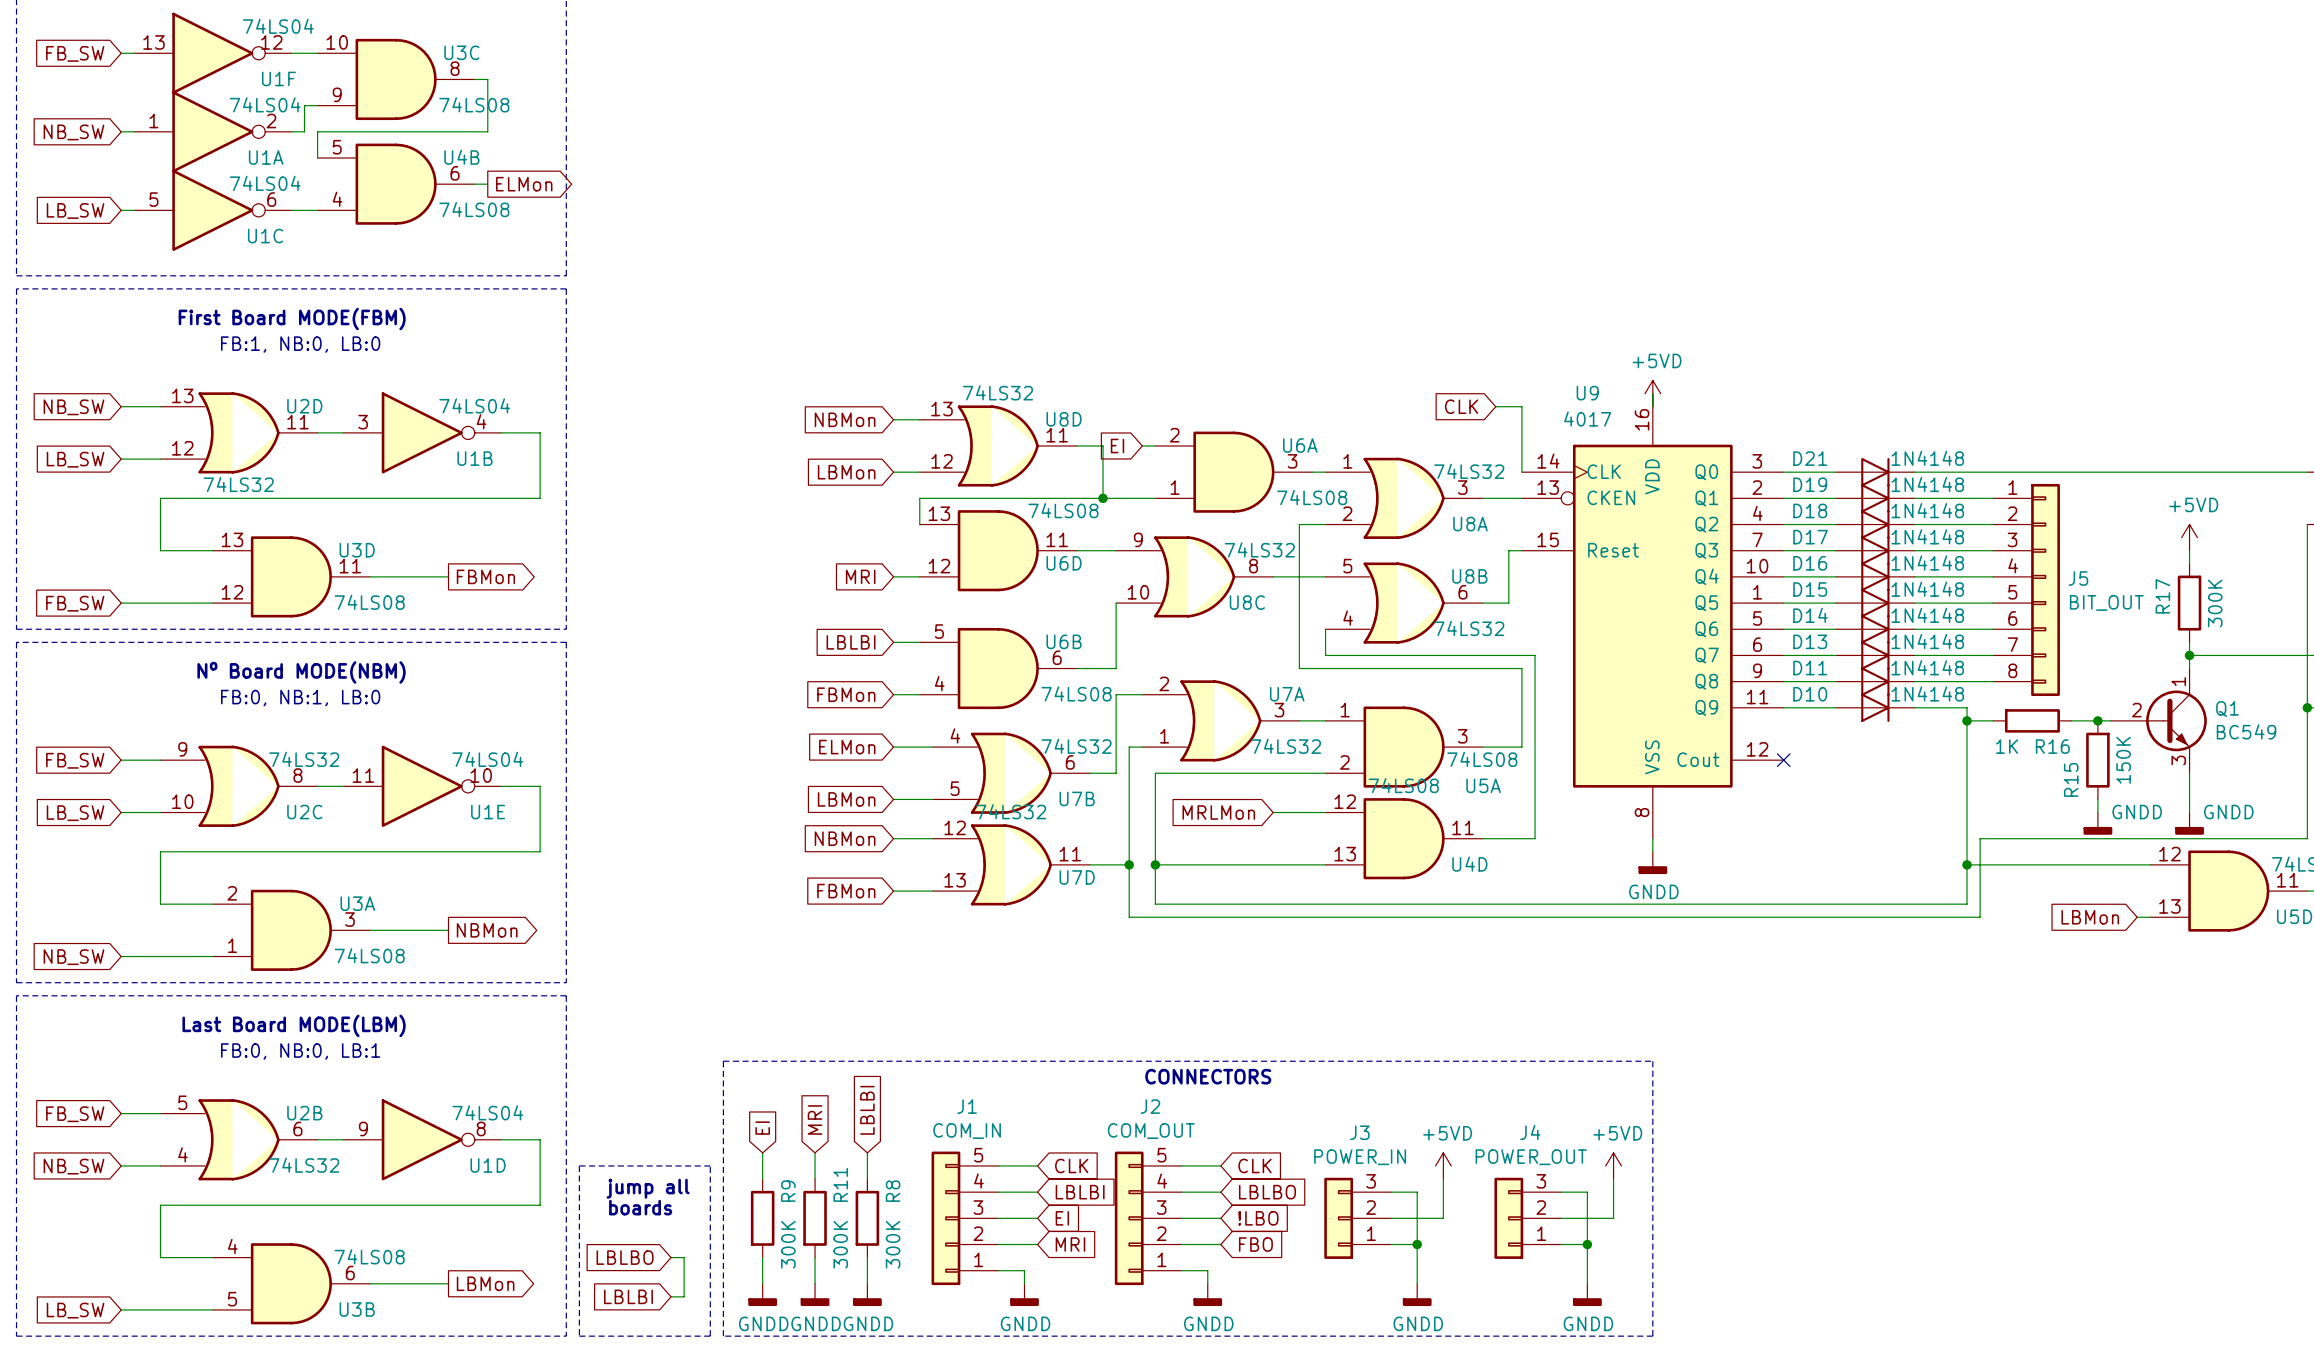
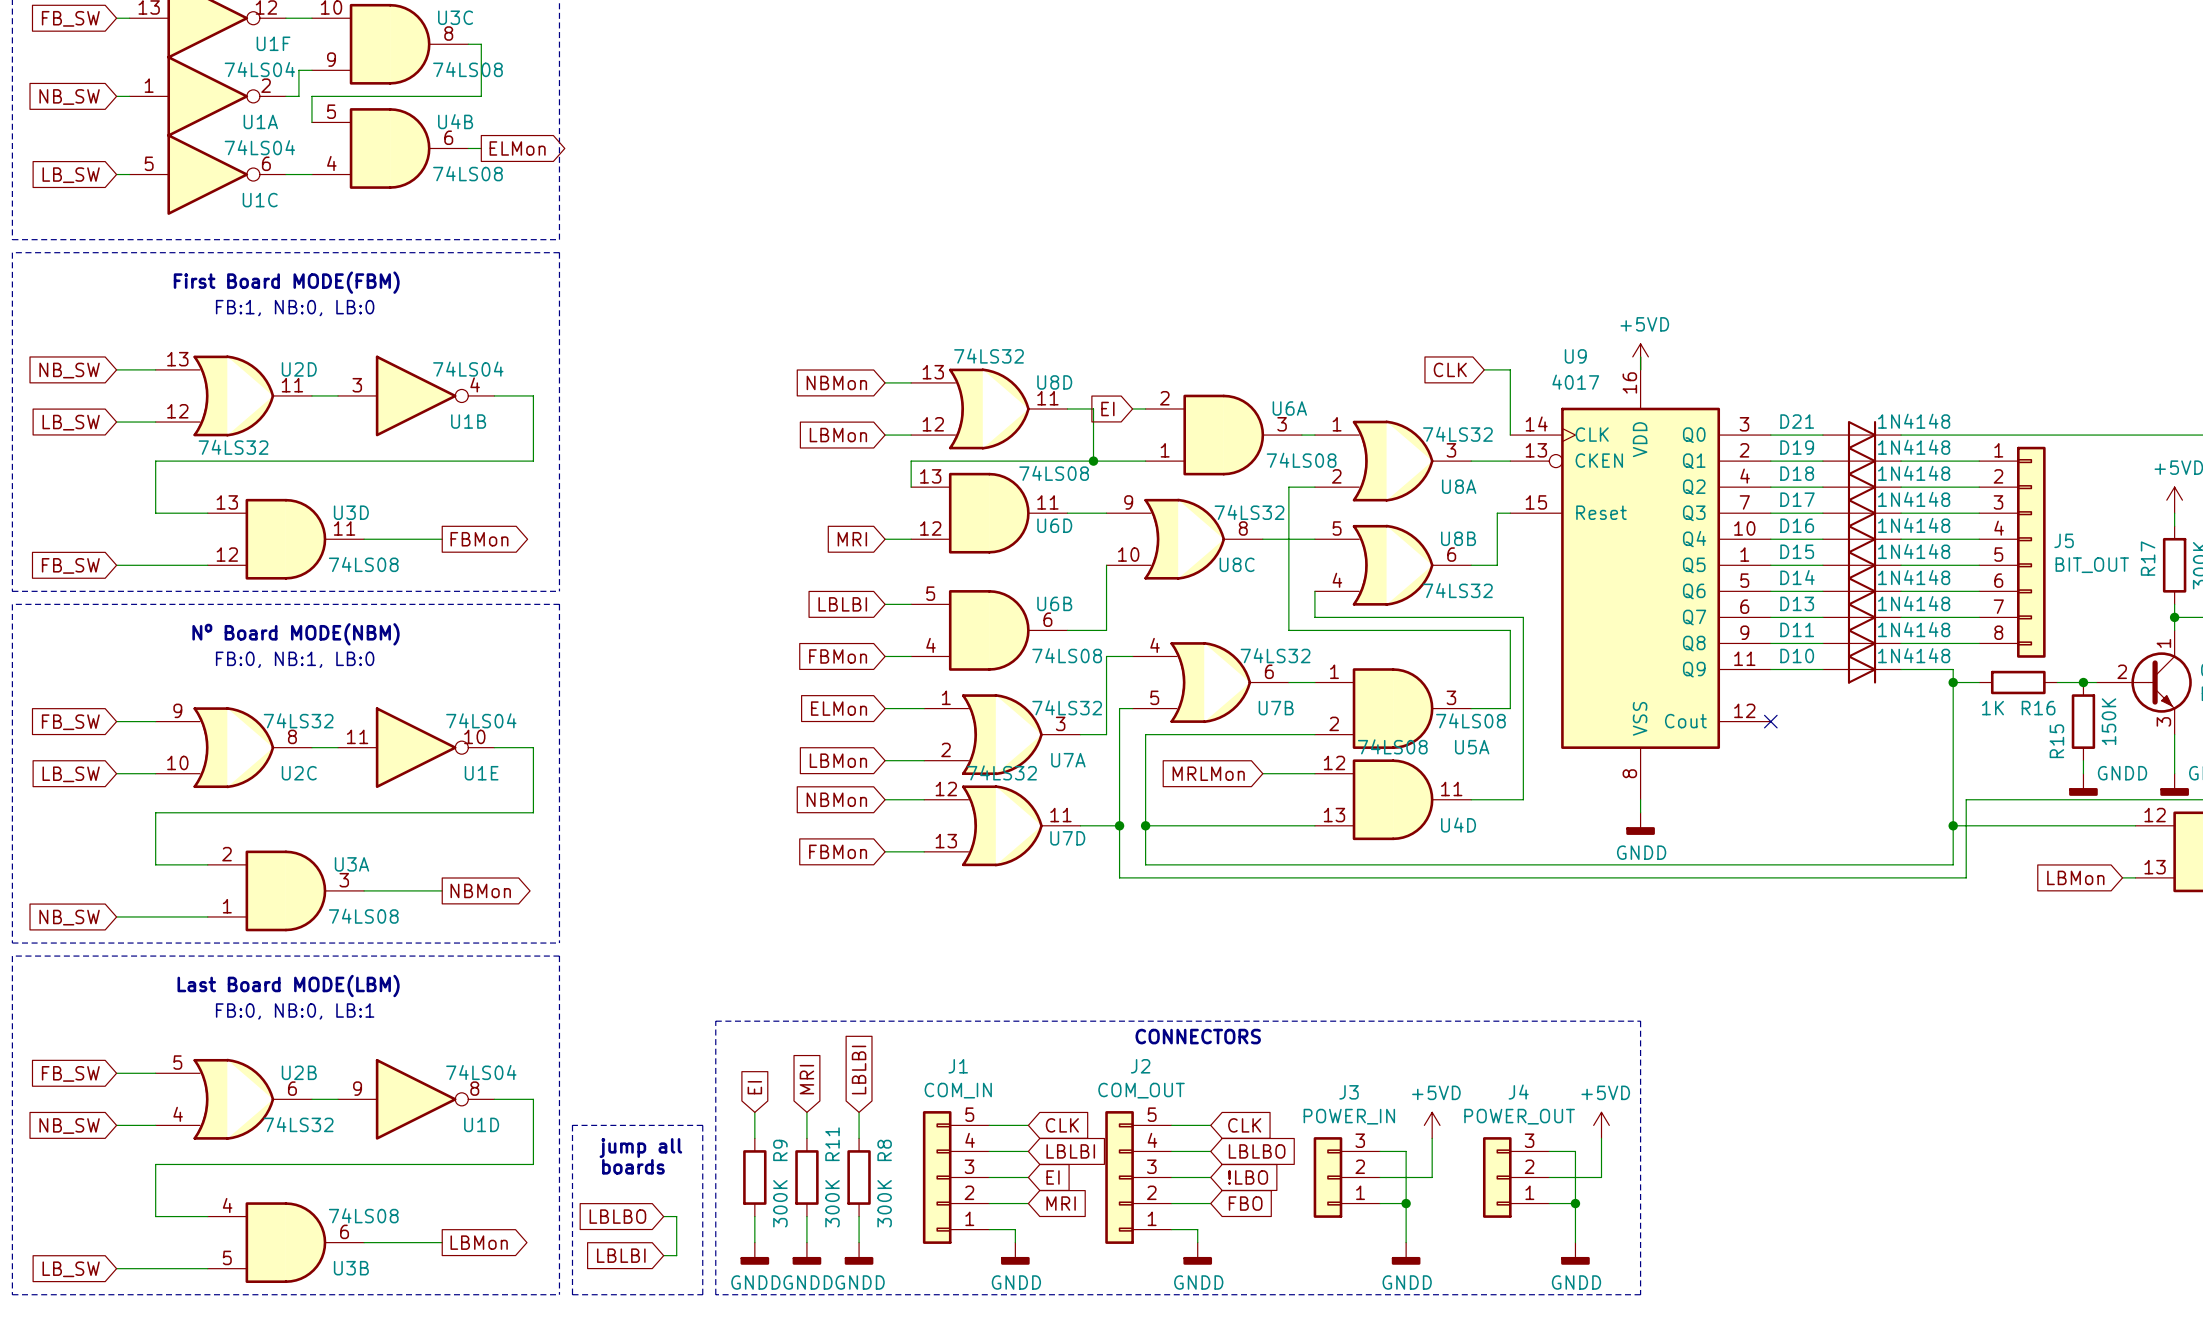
U7A flip: as is (1220, 720) -> up-down (1002, 734)
U7A position: (1220, 720) -> (1002, 734)
U7B position: (1011, 773) -> (1210, 682)

